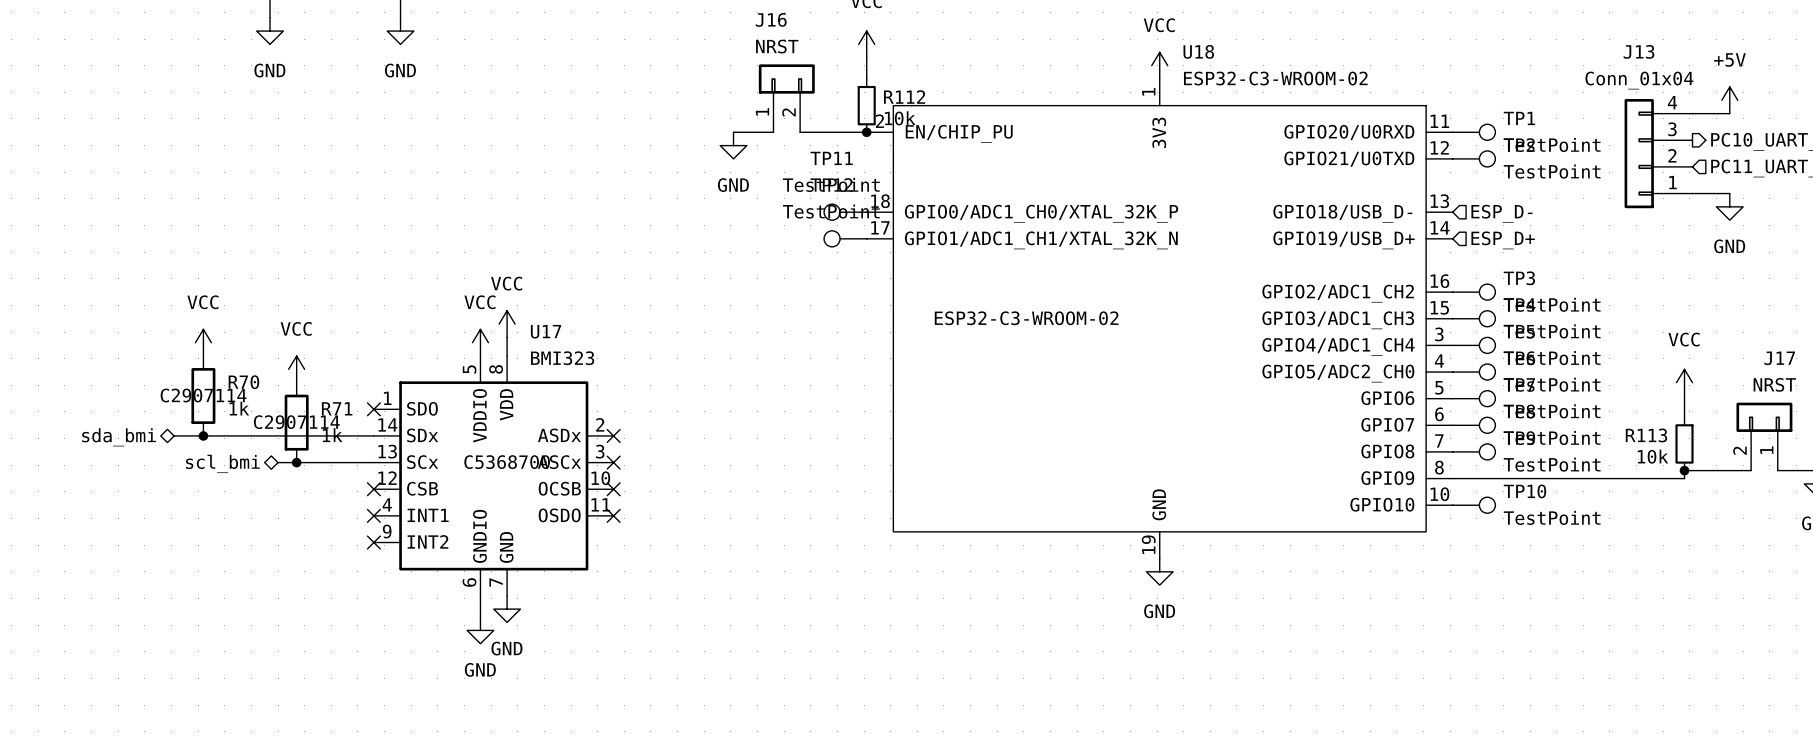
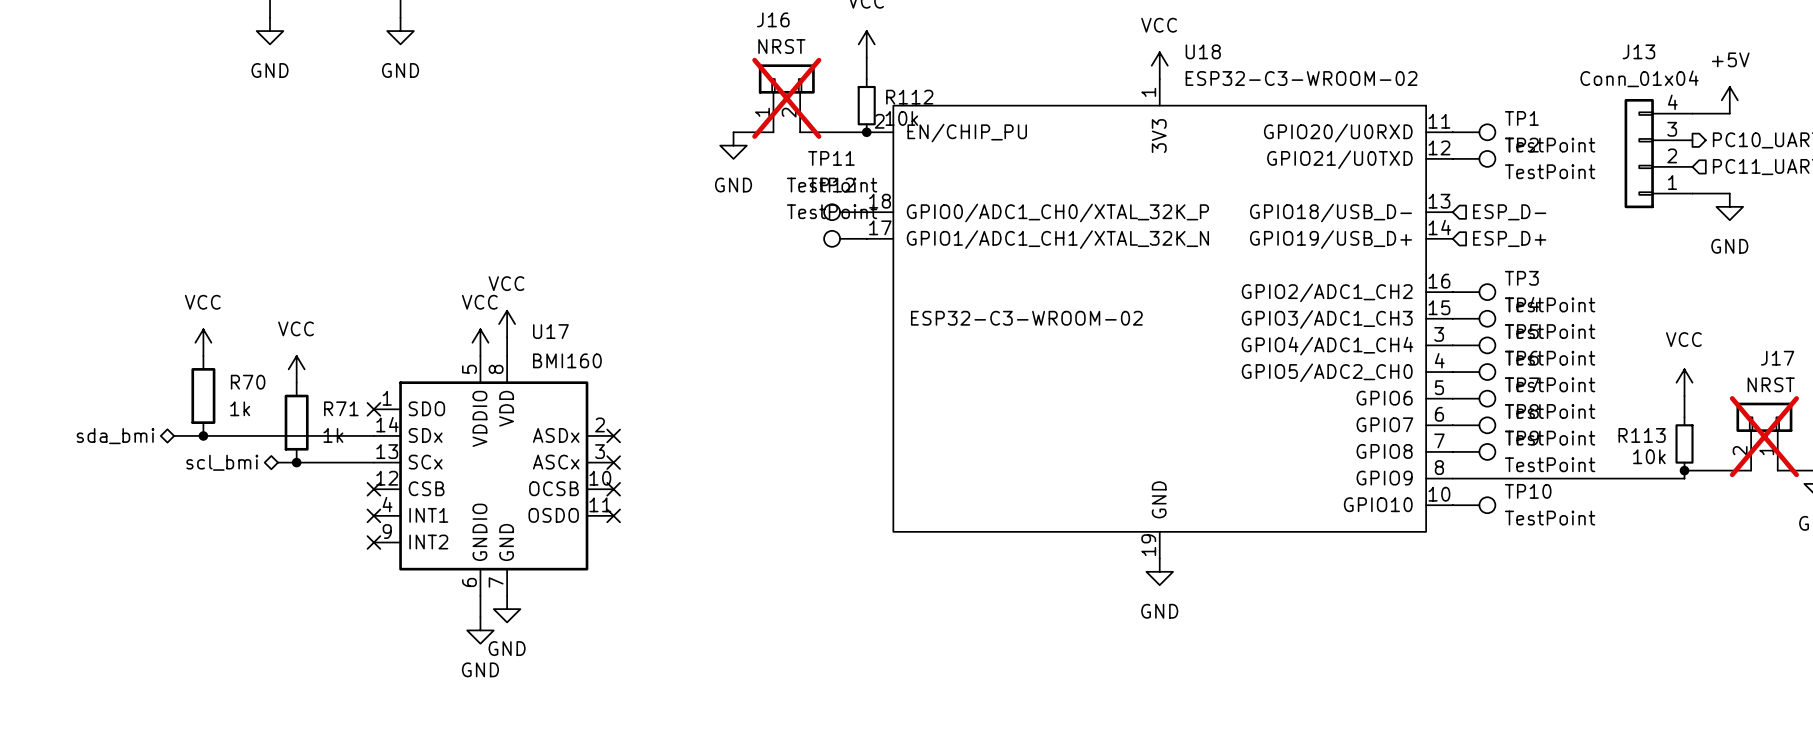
J16 do-not-place cross: none -> (786, 98)
U17 value: BMI323 (562, 358) -> BMI160 (567, 360)
R70 text: C2907114 (203, 395) -> none
R71 text: C2907114 (296, 422) -> none
J17 do-not-place cross: none -> (1764, 436)
U17 text: C5368700 (507, 462) -> none

